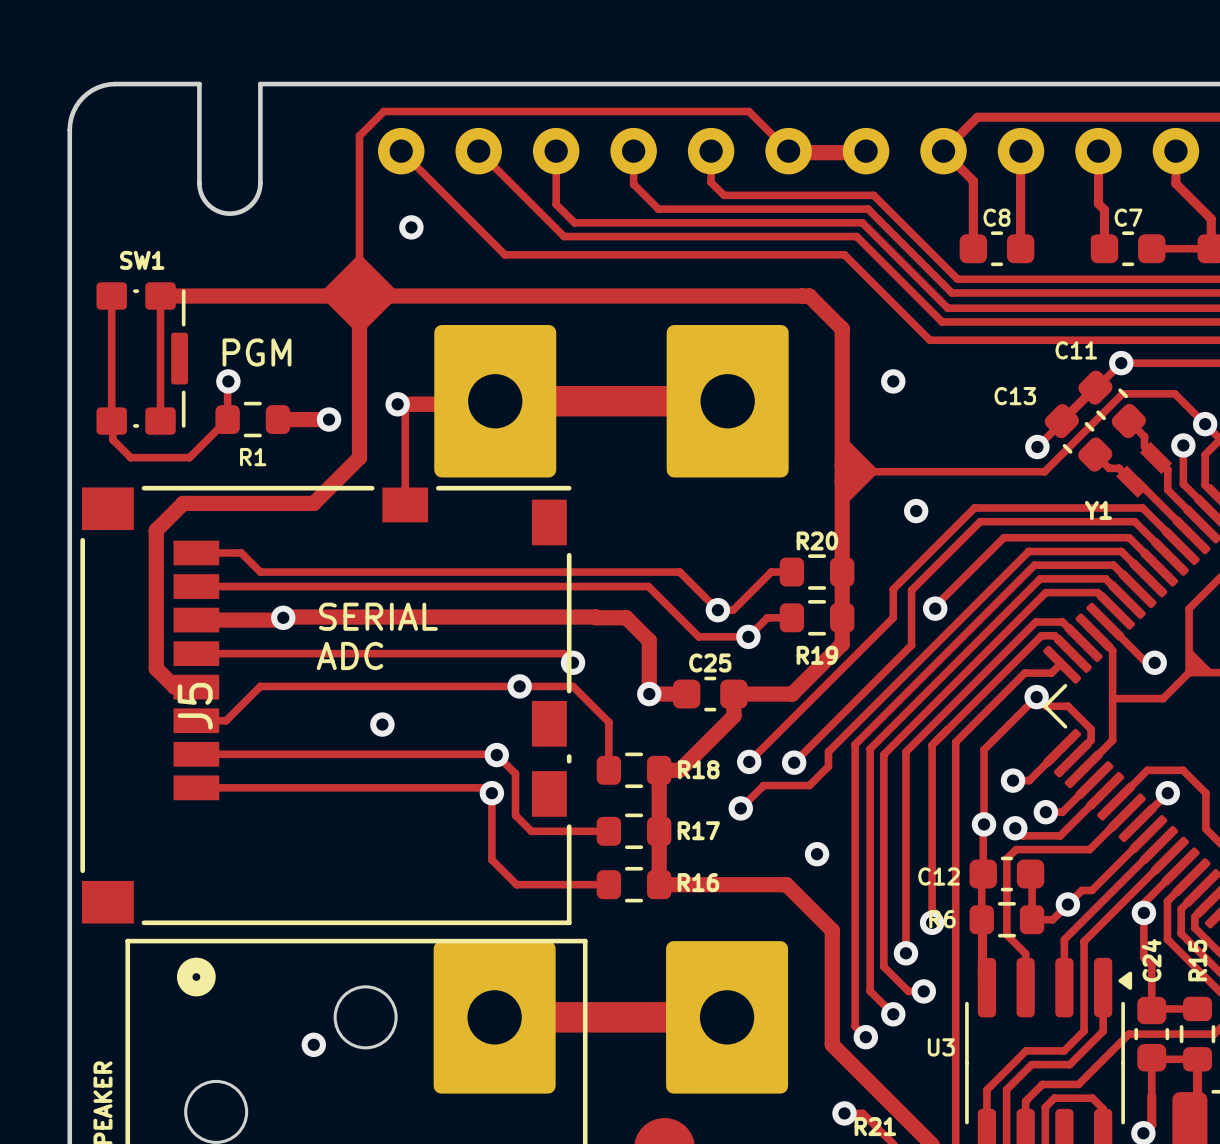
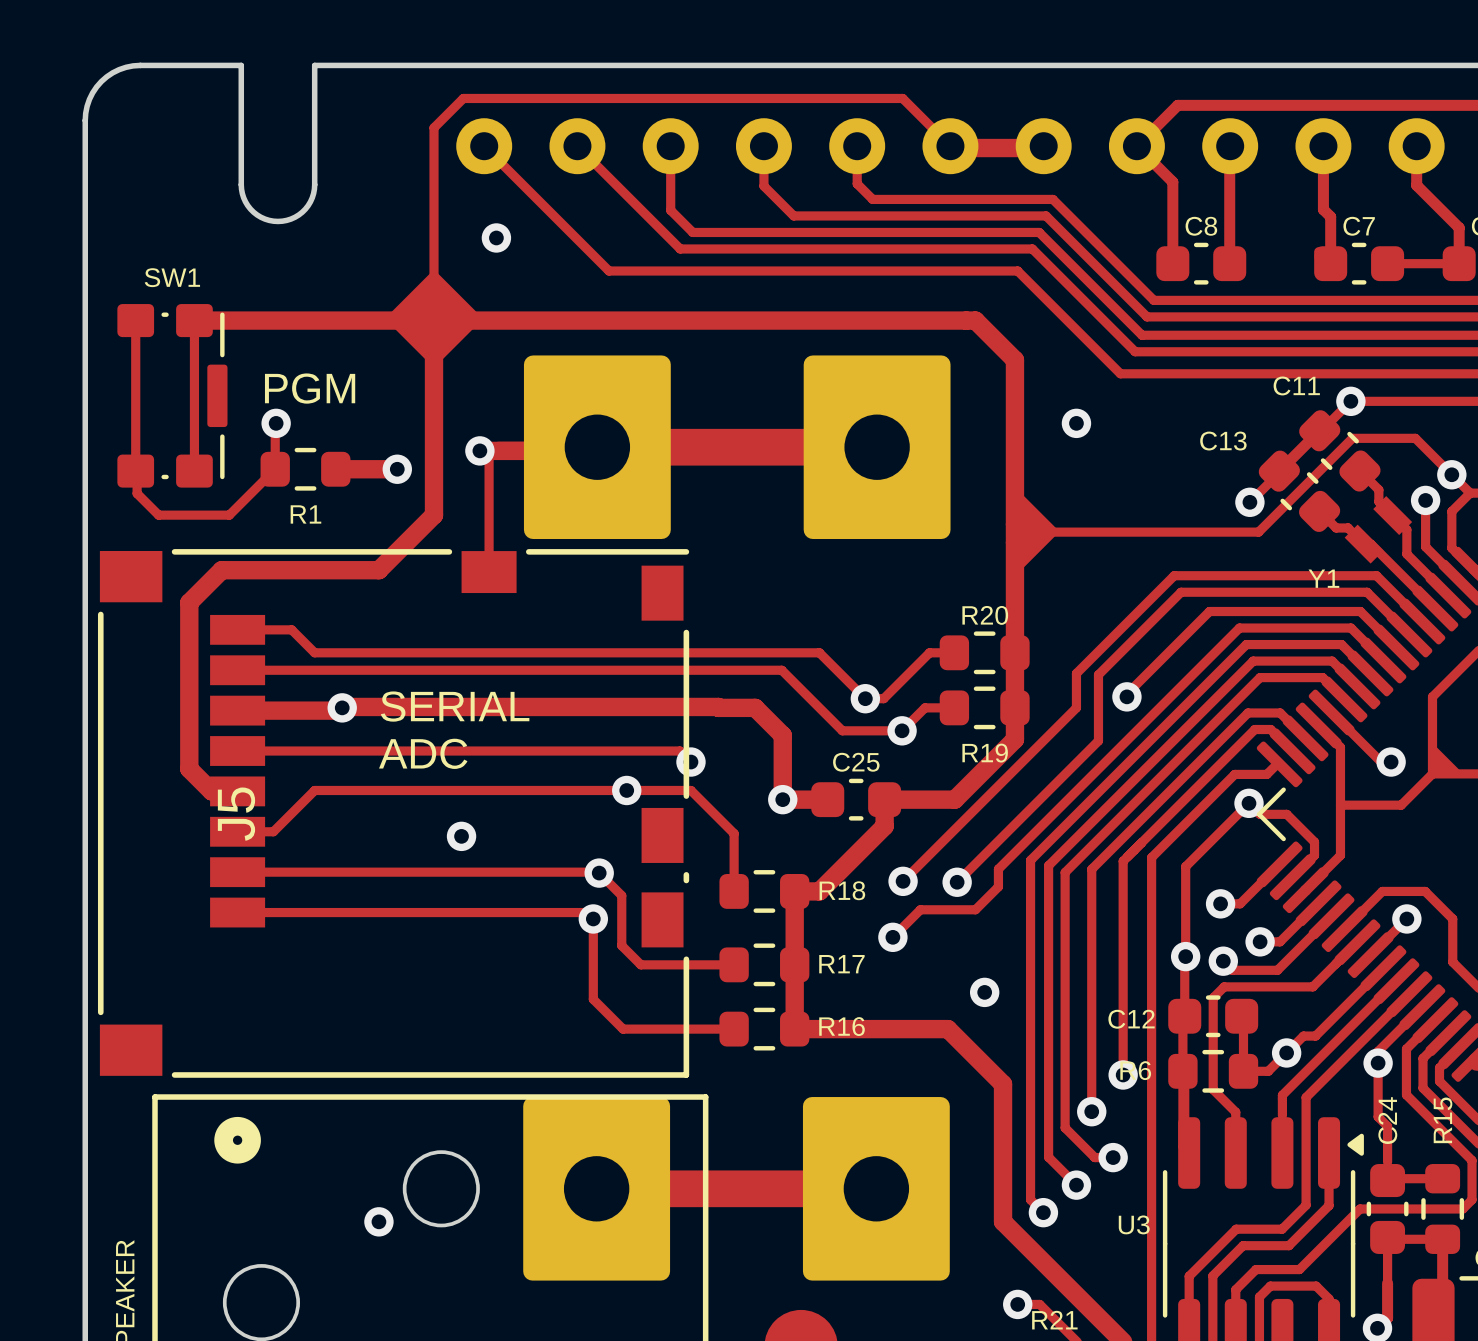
via: (916, 511) -> none

